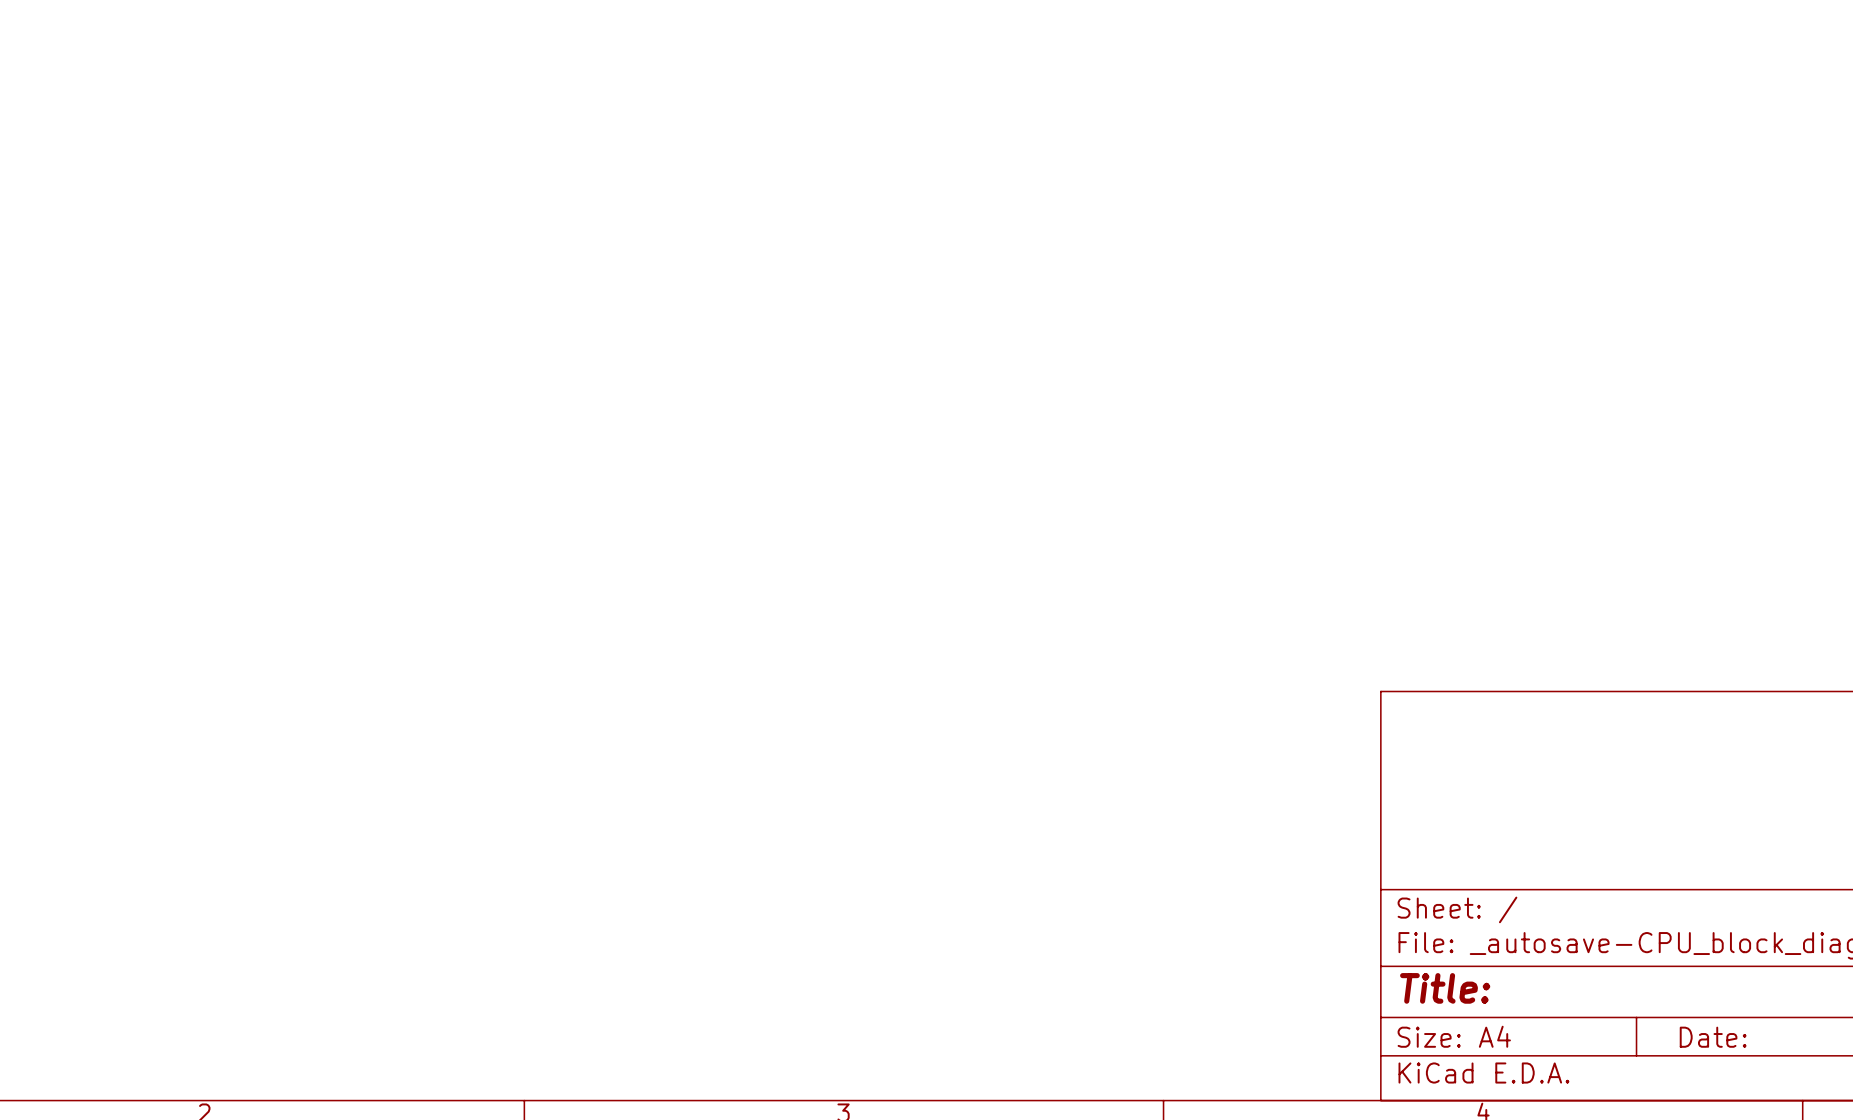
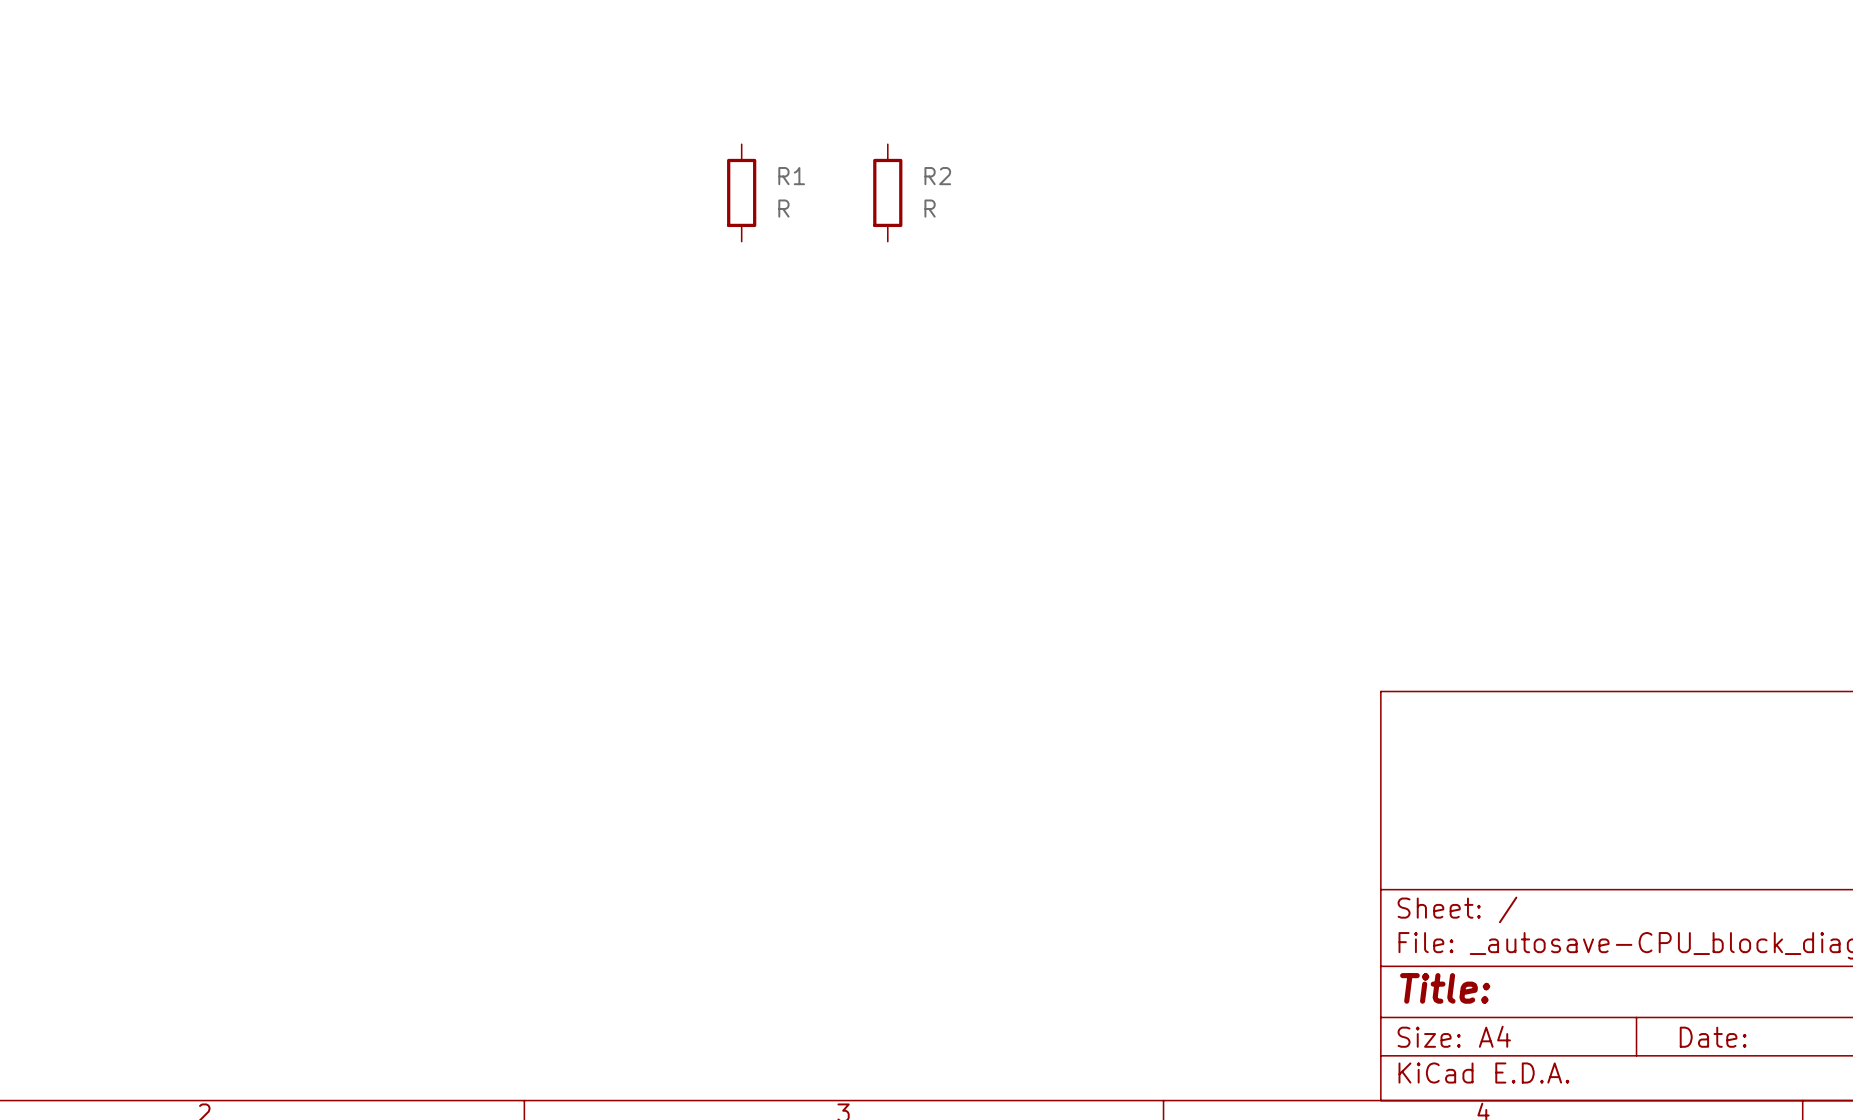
R1: none -> R (741, 192)
R2: none -> R (887, 192)

